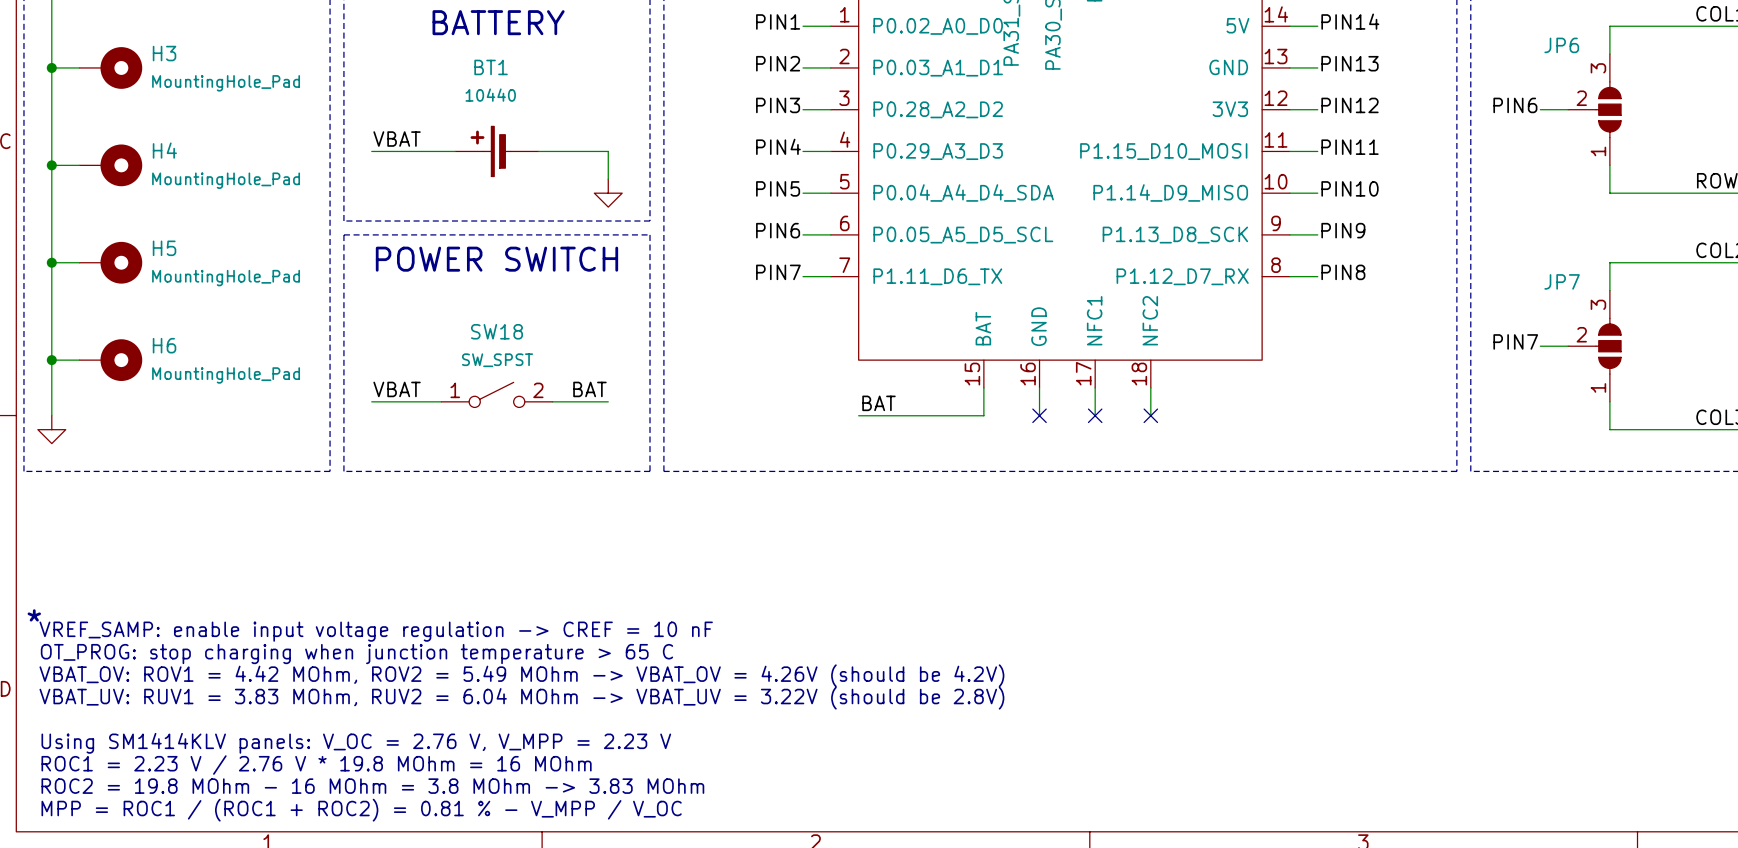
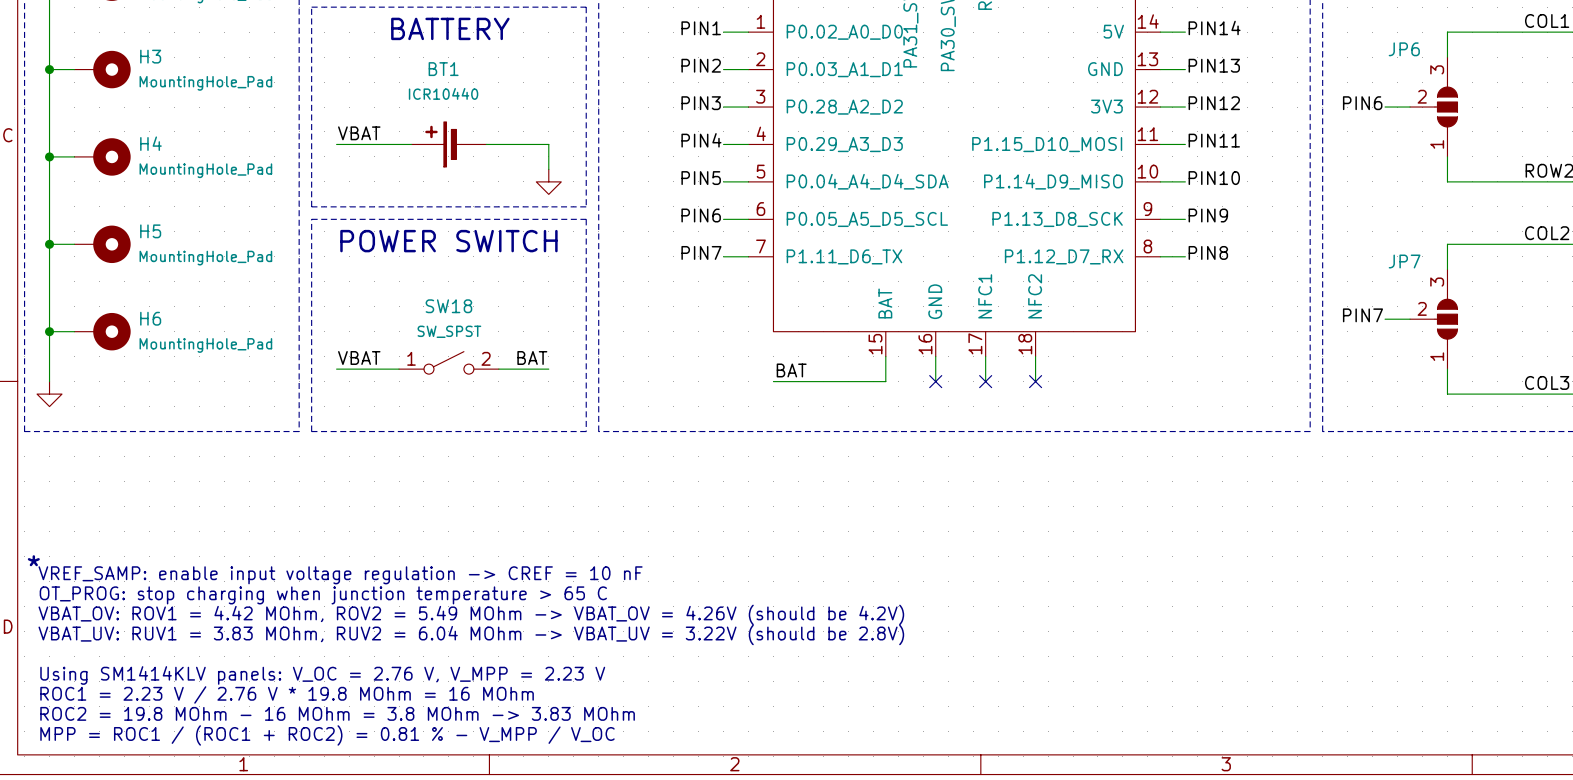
BT1 value: 10440 (490, 95) -> ICR10440 (443, 93)

